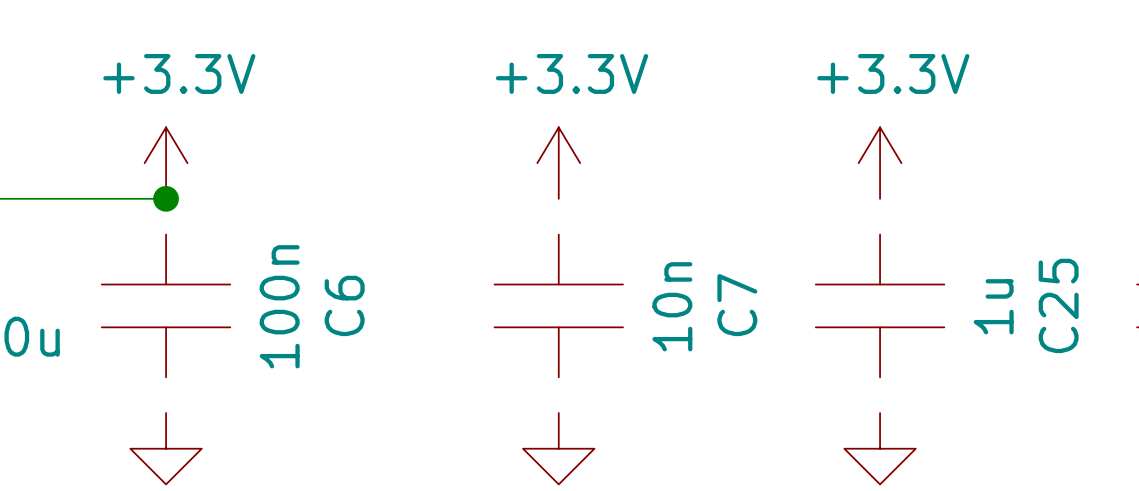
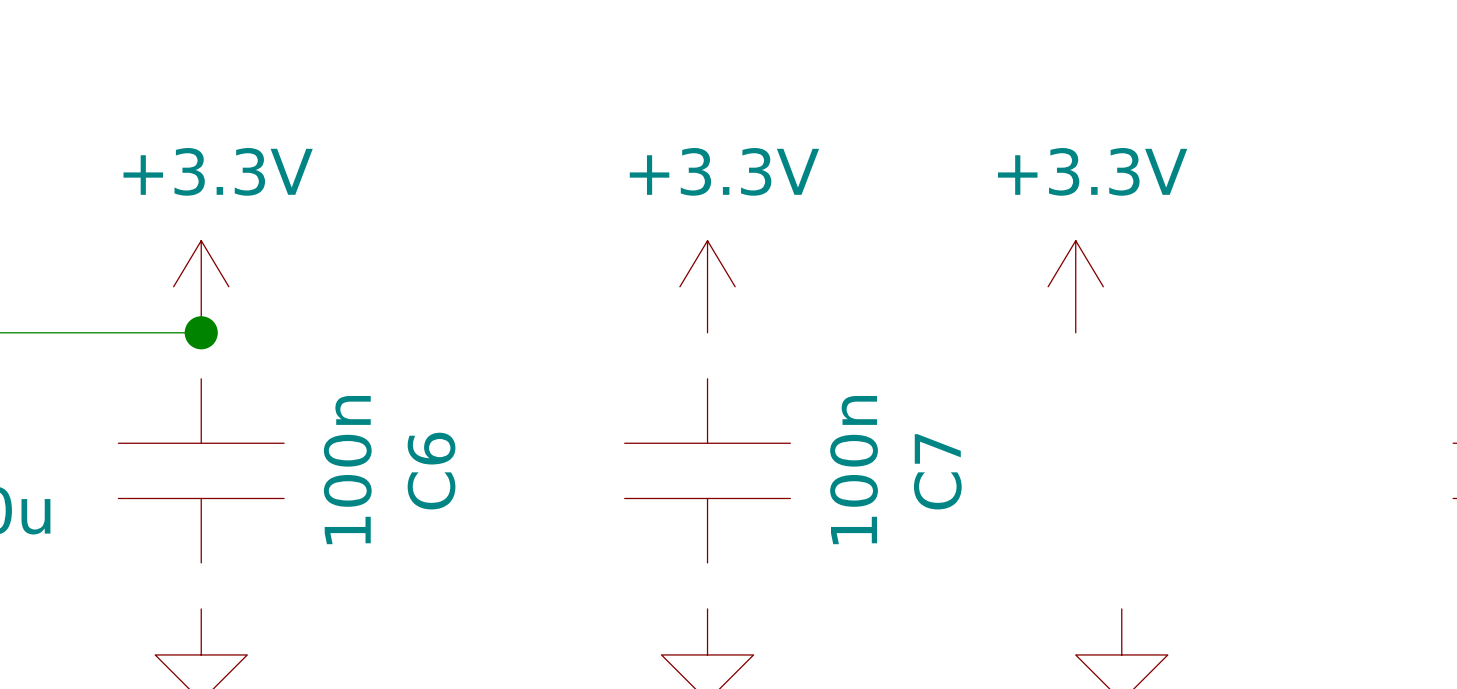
power symbol position: +3.3V (880, 163) -> +3.3V (1075, 286)
C25: 1u (880, 305) -> none
C7 value: 10n (672, 306) -> 100n (854, 470)

